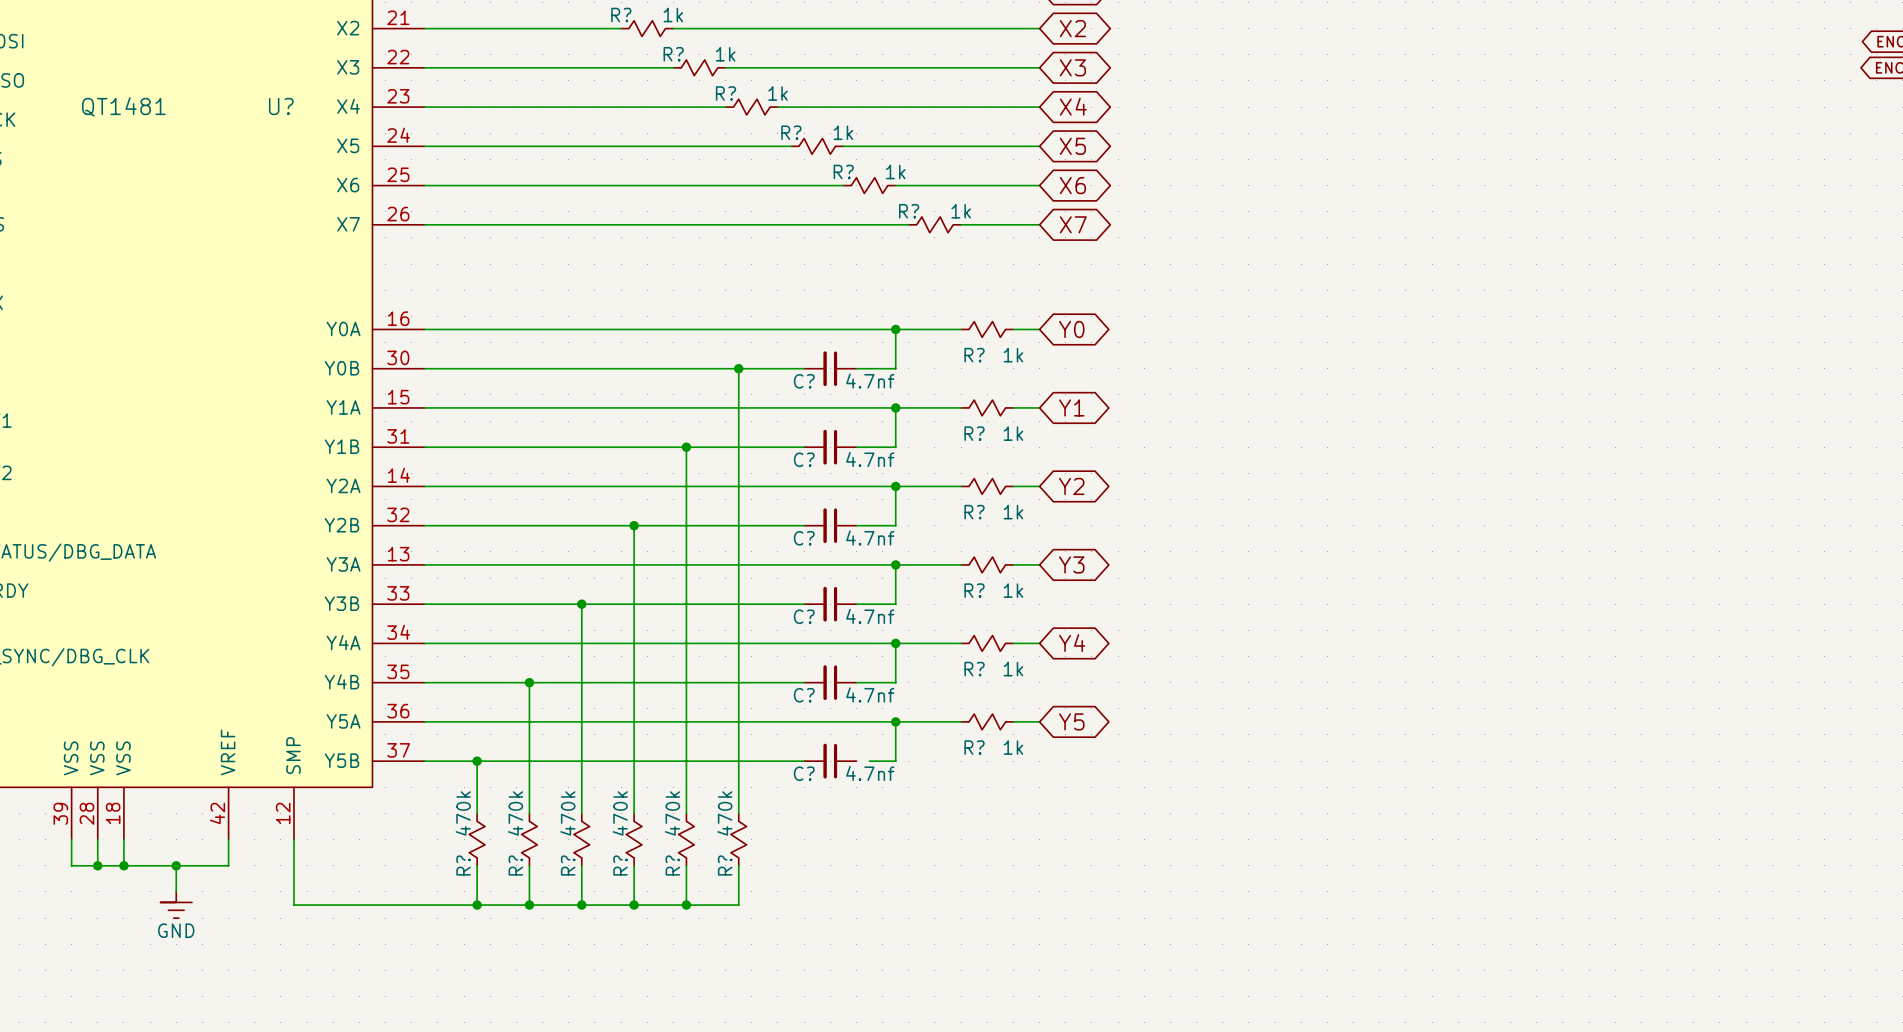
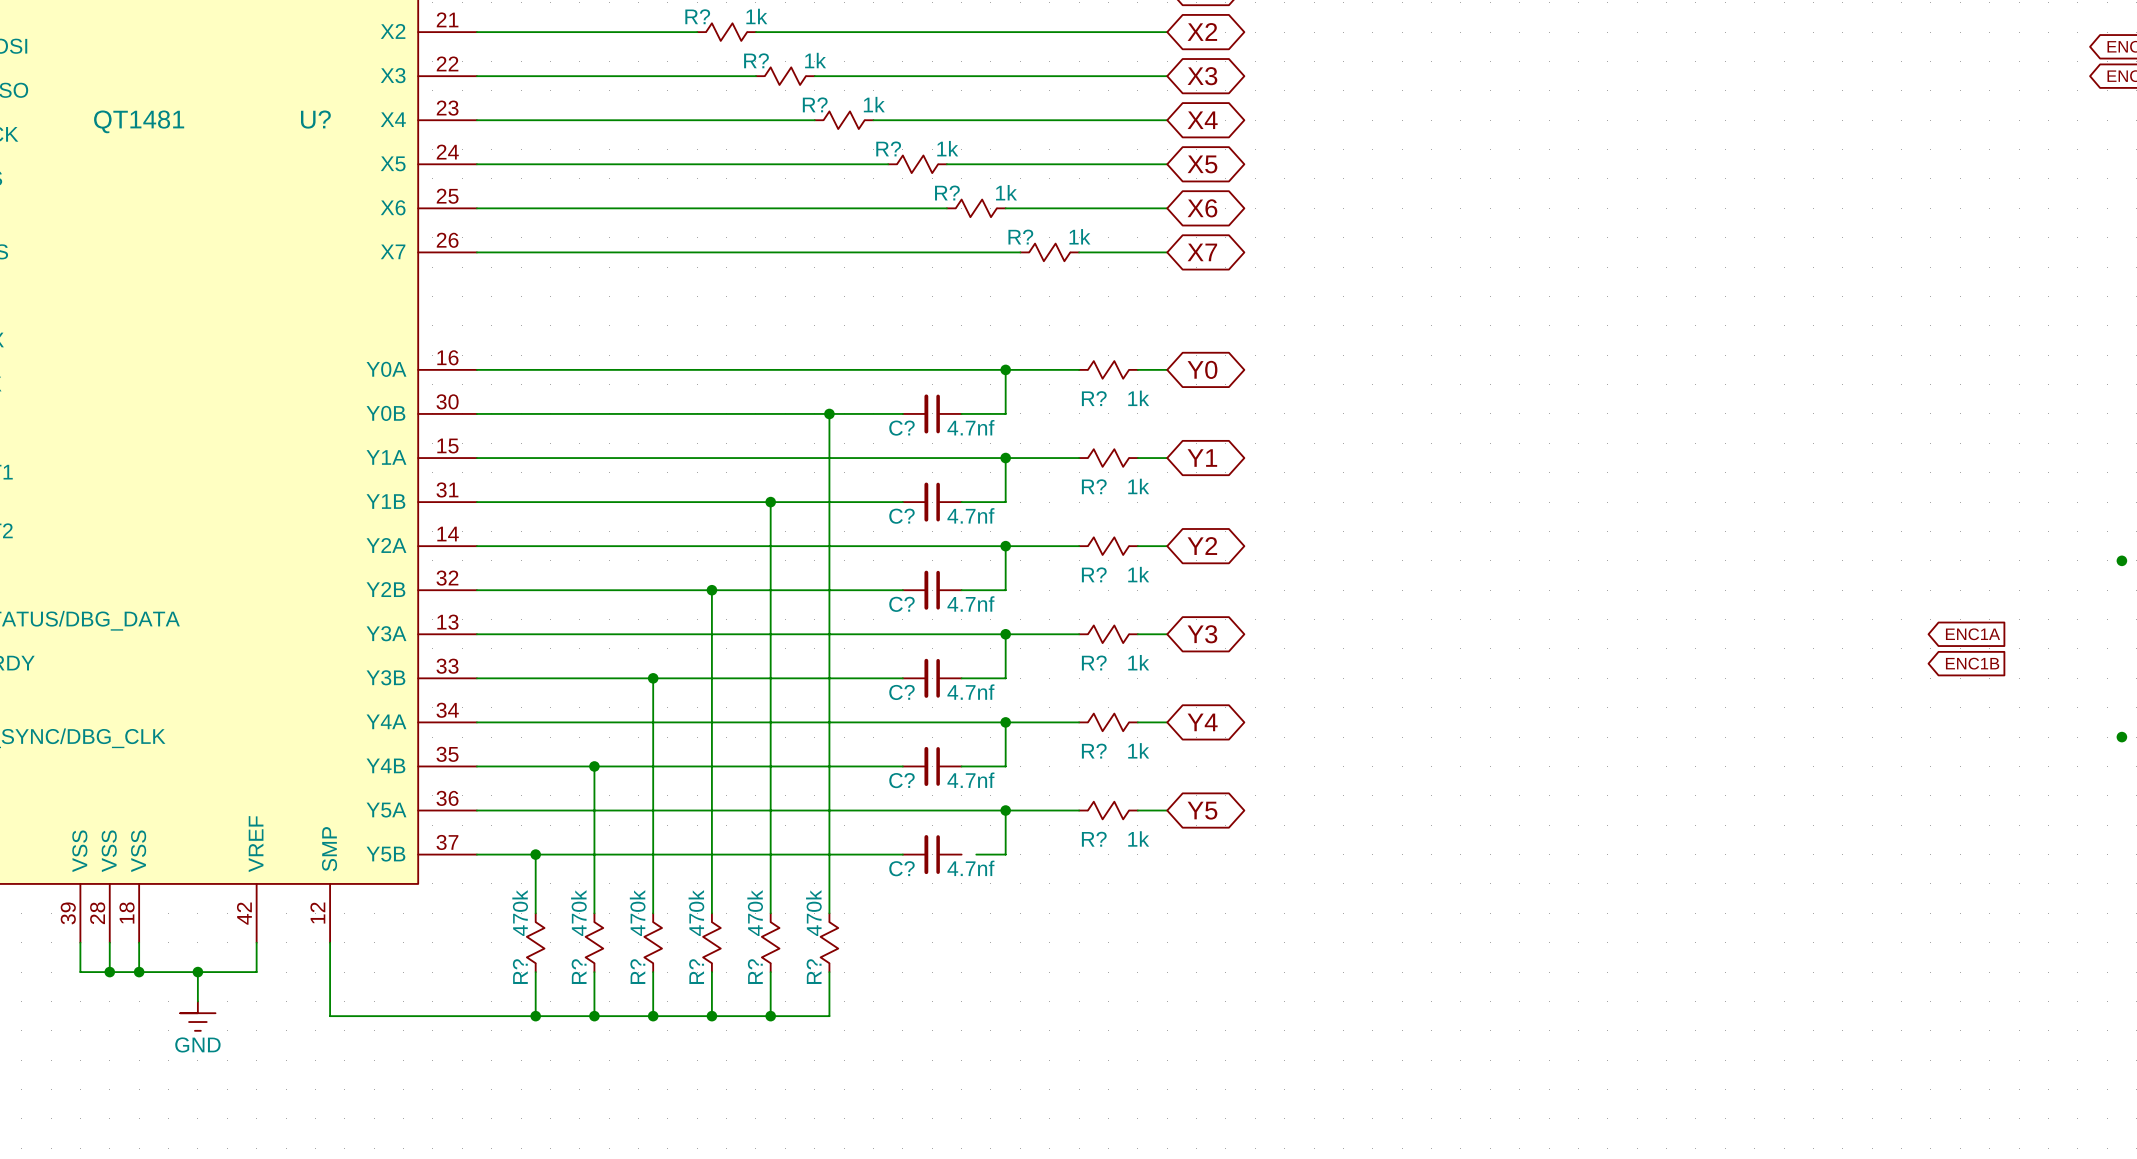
junction: none -> (2121, 560)
global label: none -> ENC1A (1973, 634)
global label: none -> ENC1B (1972, 663)
junction: none -> (2121, 737)

